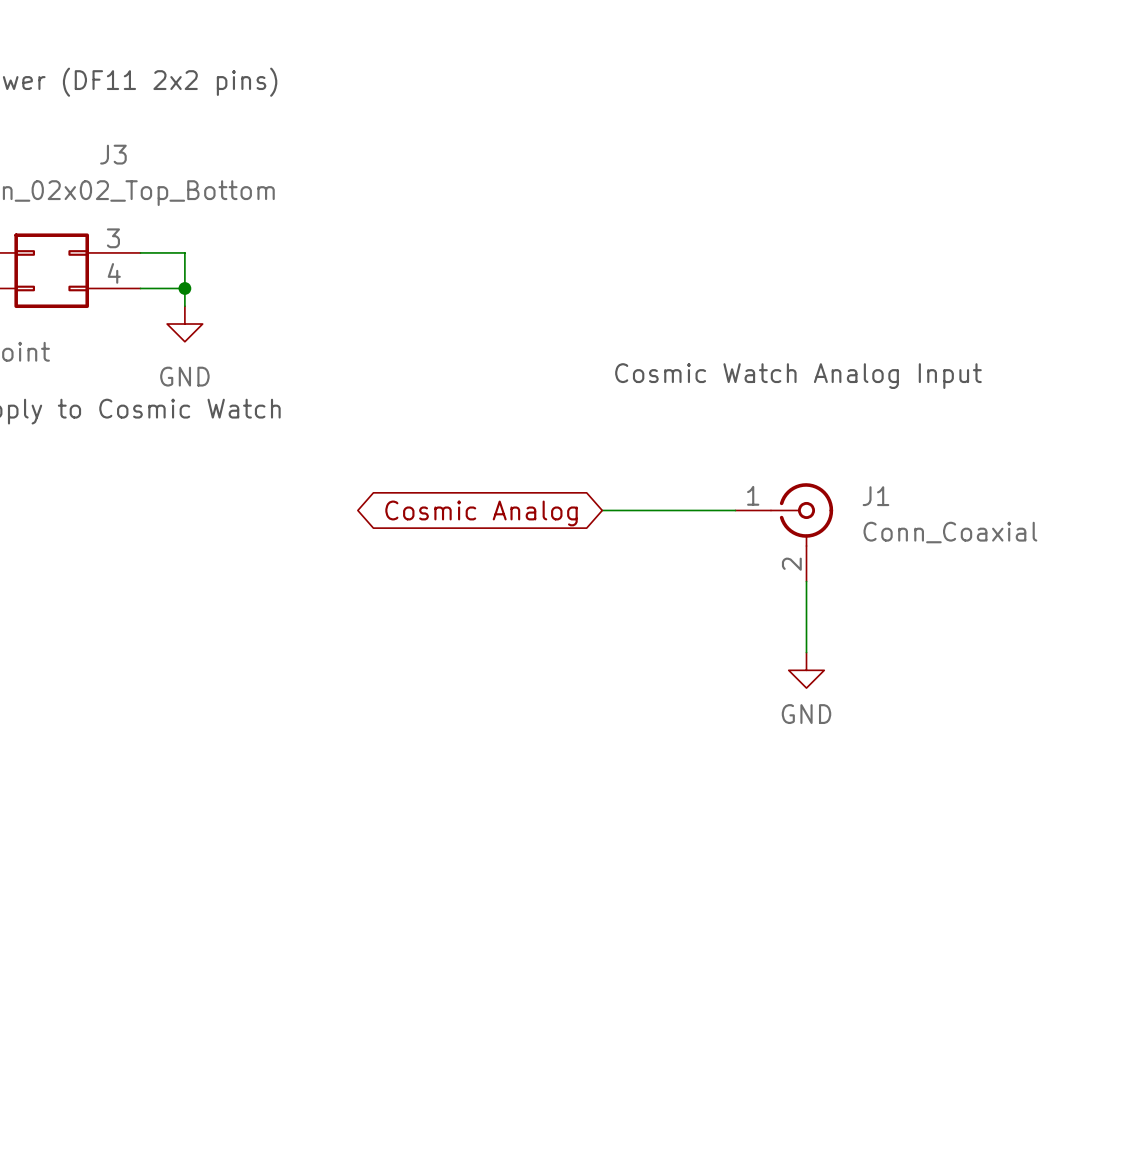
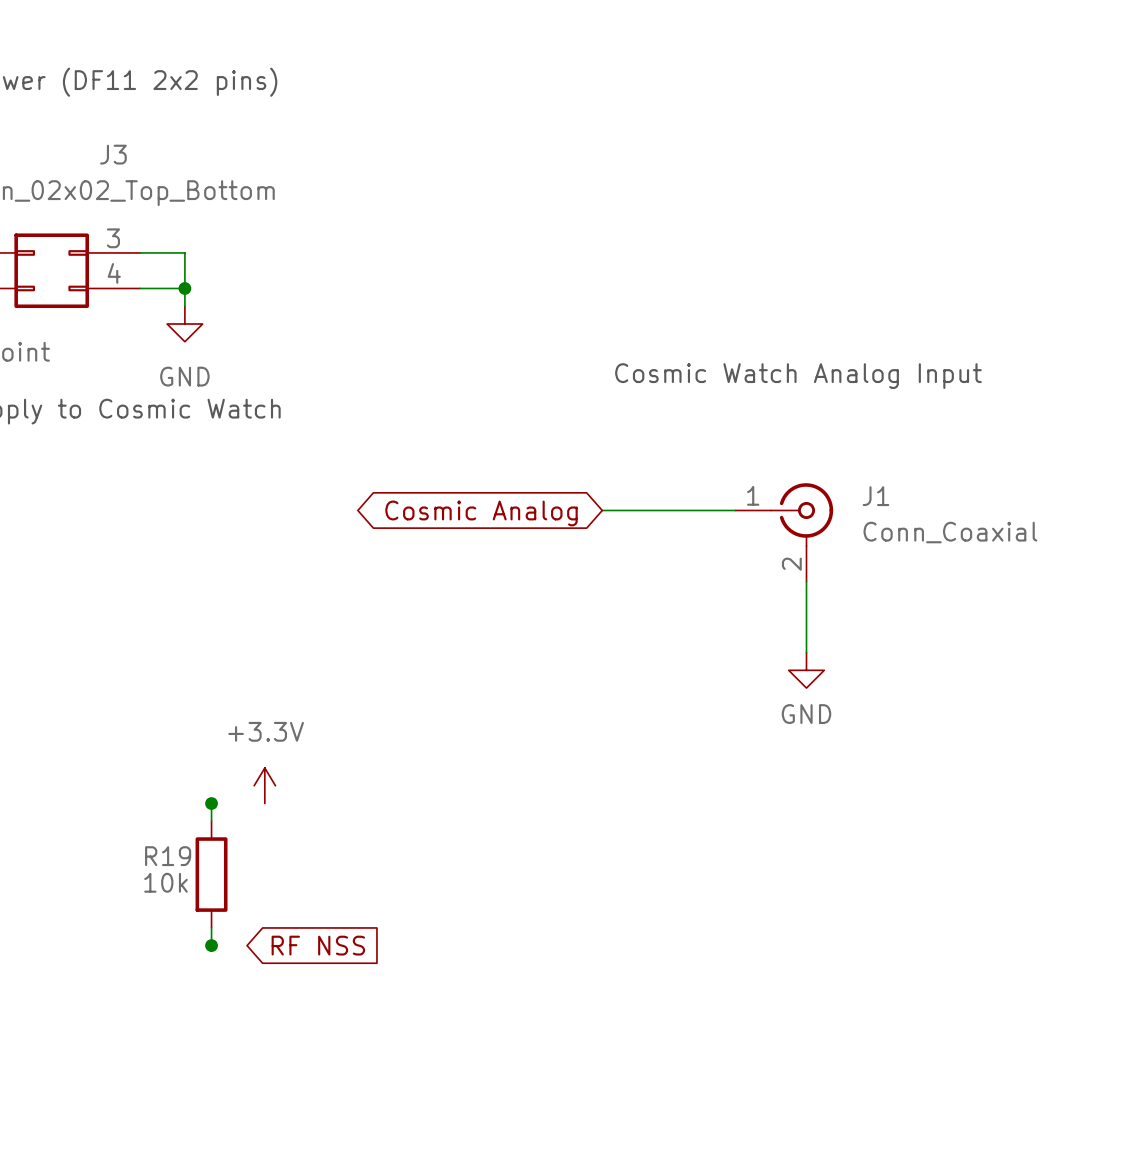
power symbol: none -> +3.3V (264, 785)
wire: none -> (211, 803) (211, 821)
junction: none -> (211, 803)
R19: none -> 10k (211, 874)
wire: none -> (211, 927) (211, 945)
junction: none -> (211, 945)
global label: none -> RF NSS (318, 945)

